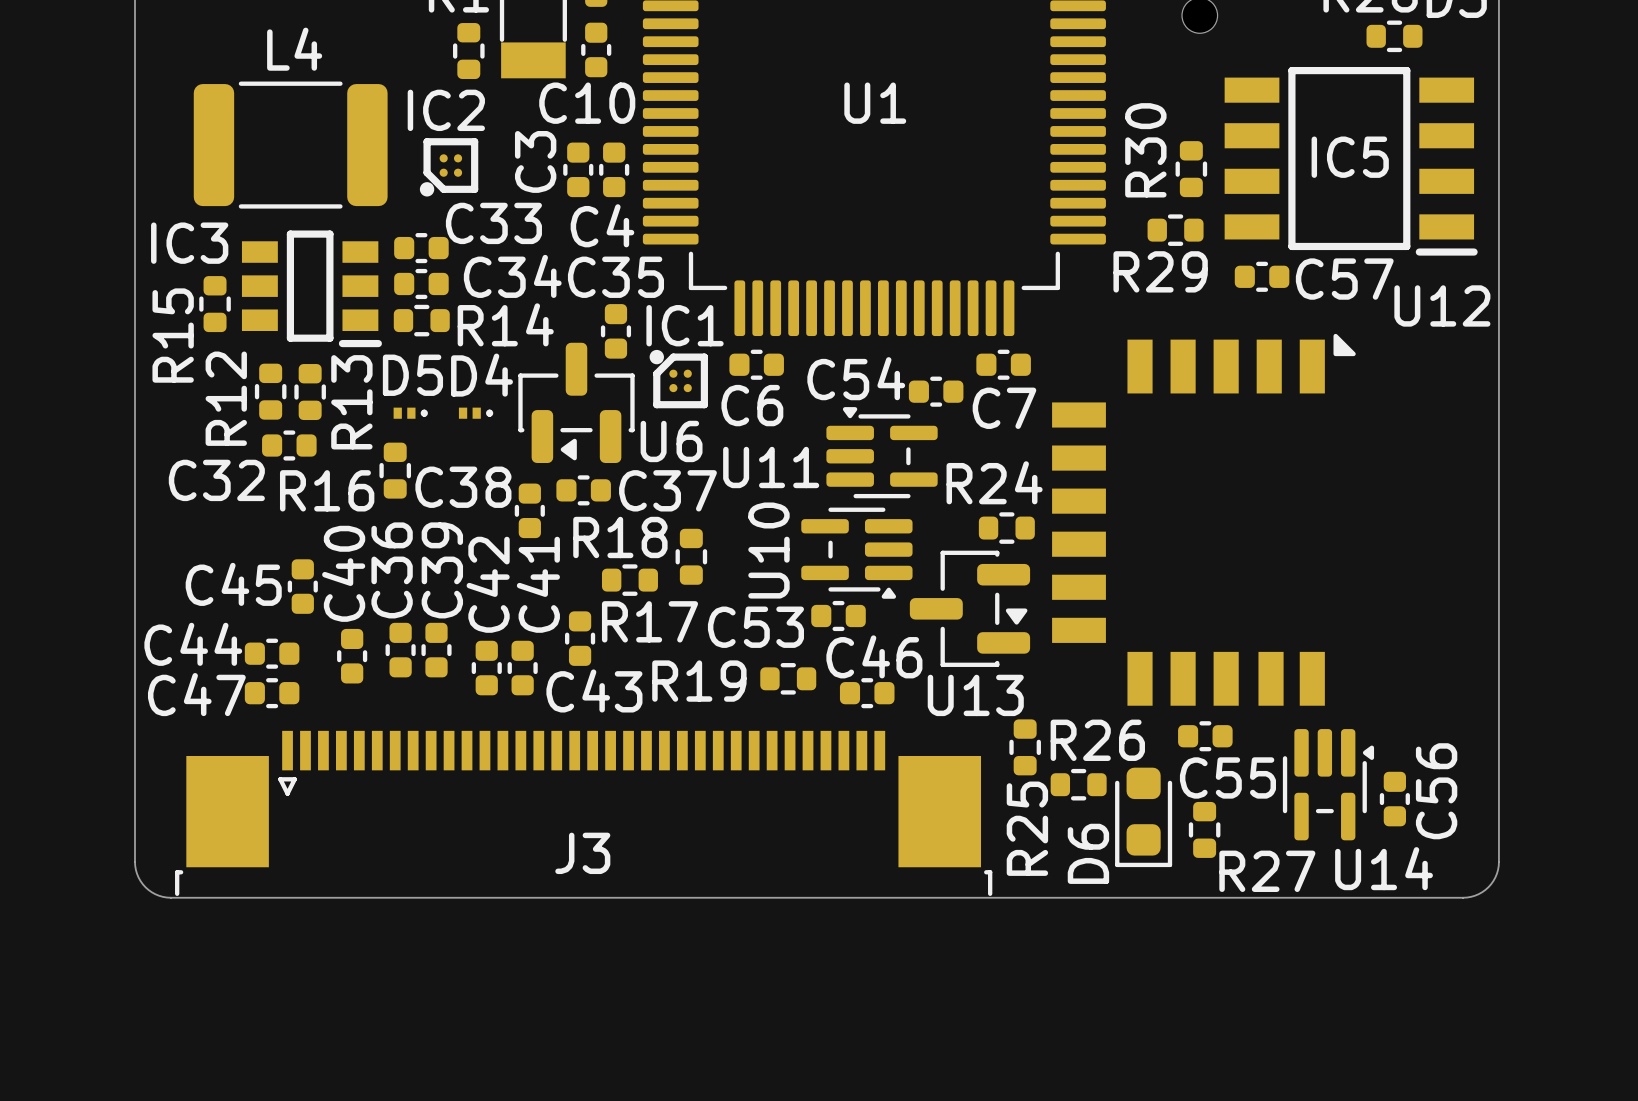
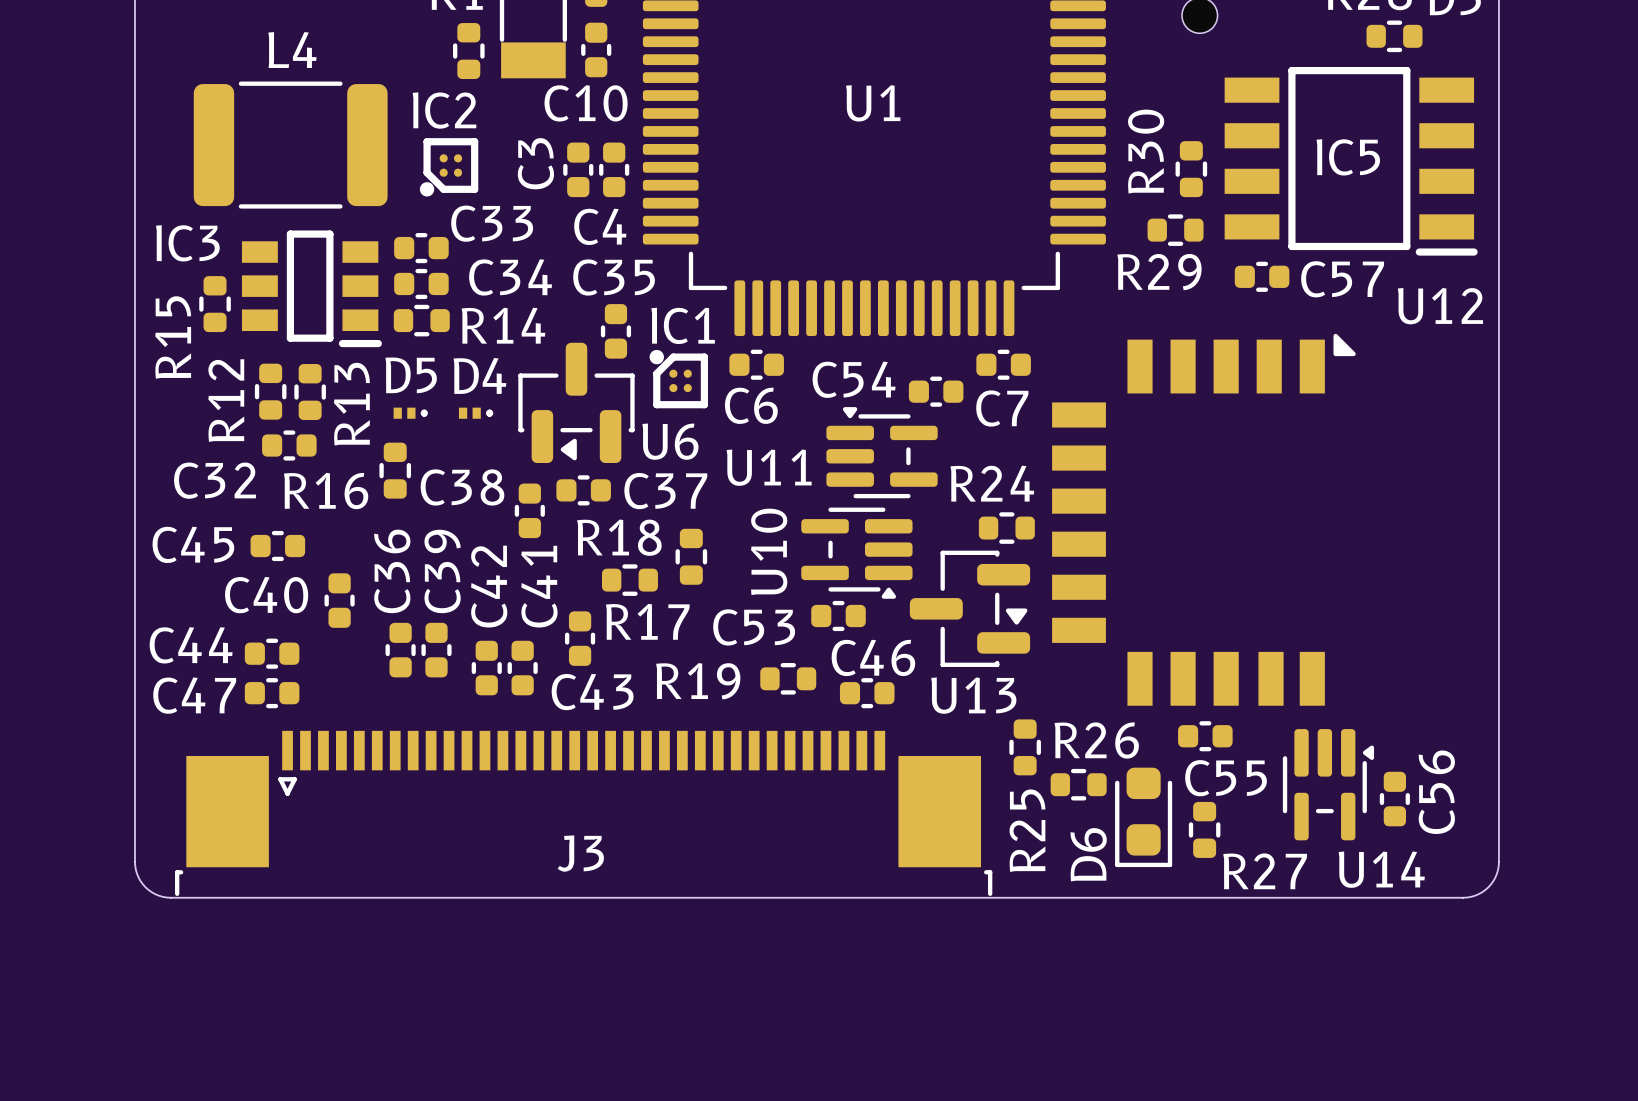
C40 name rotation: 0° (343, 573) -> 90° clockwise (266, 595)
C45 rotation: 0° (302, 586) -> 90° clockwise (277, 546)
C45 position: (302, 586) -> (277, 546)
C40 position: (352, 656) -> (339, 600)

